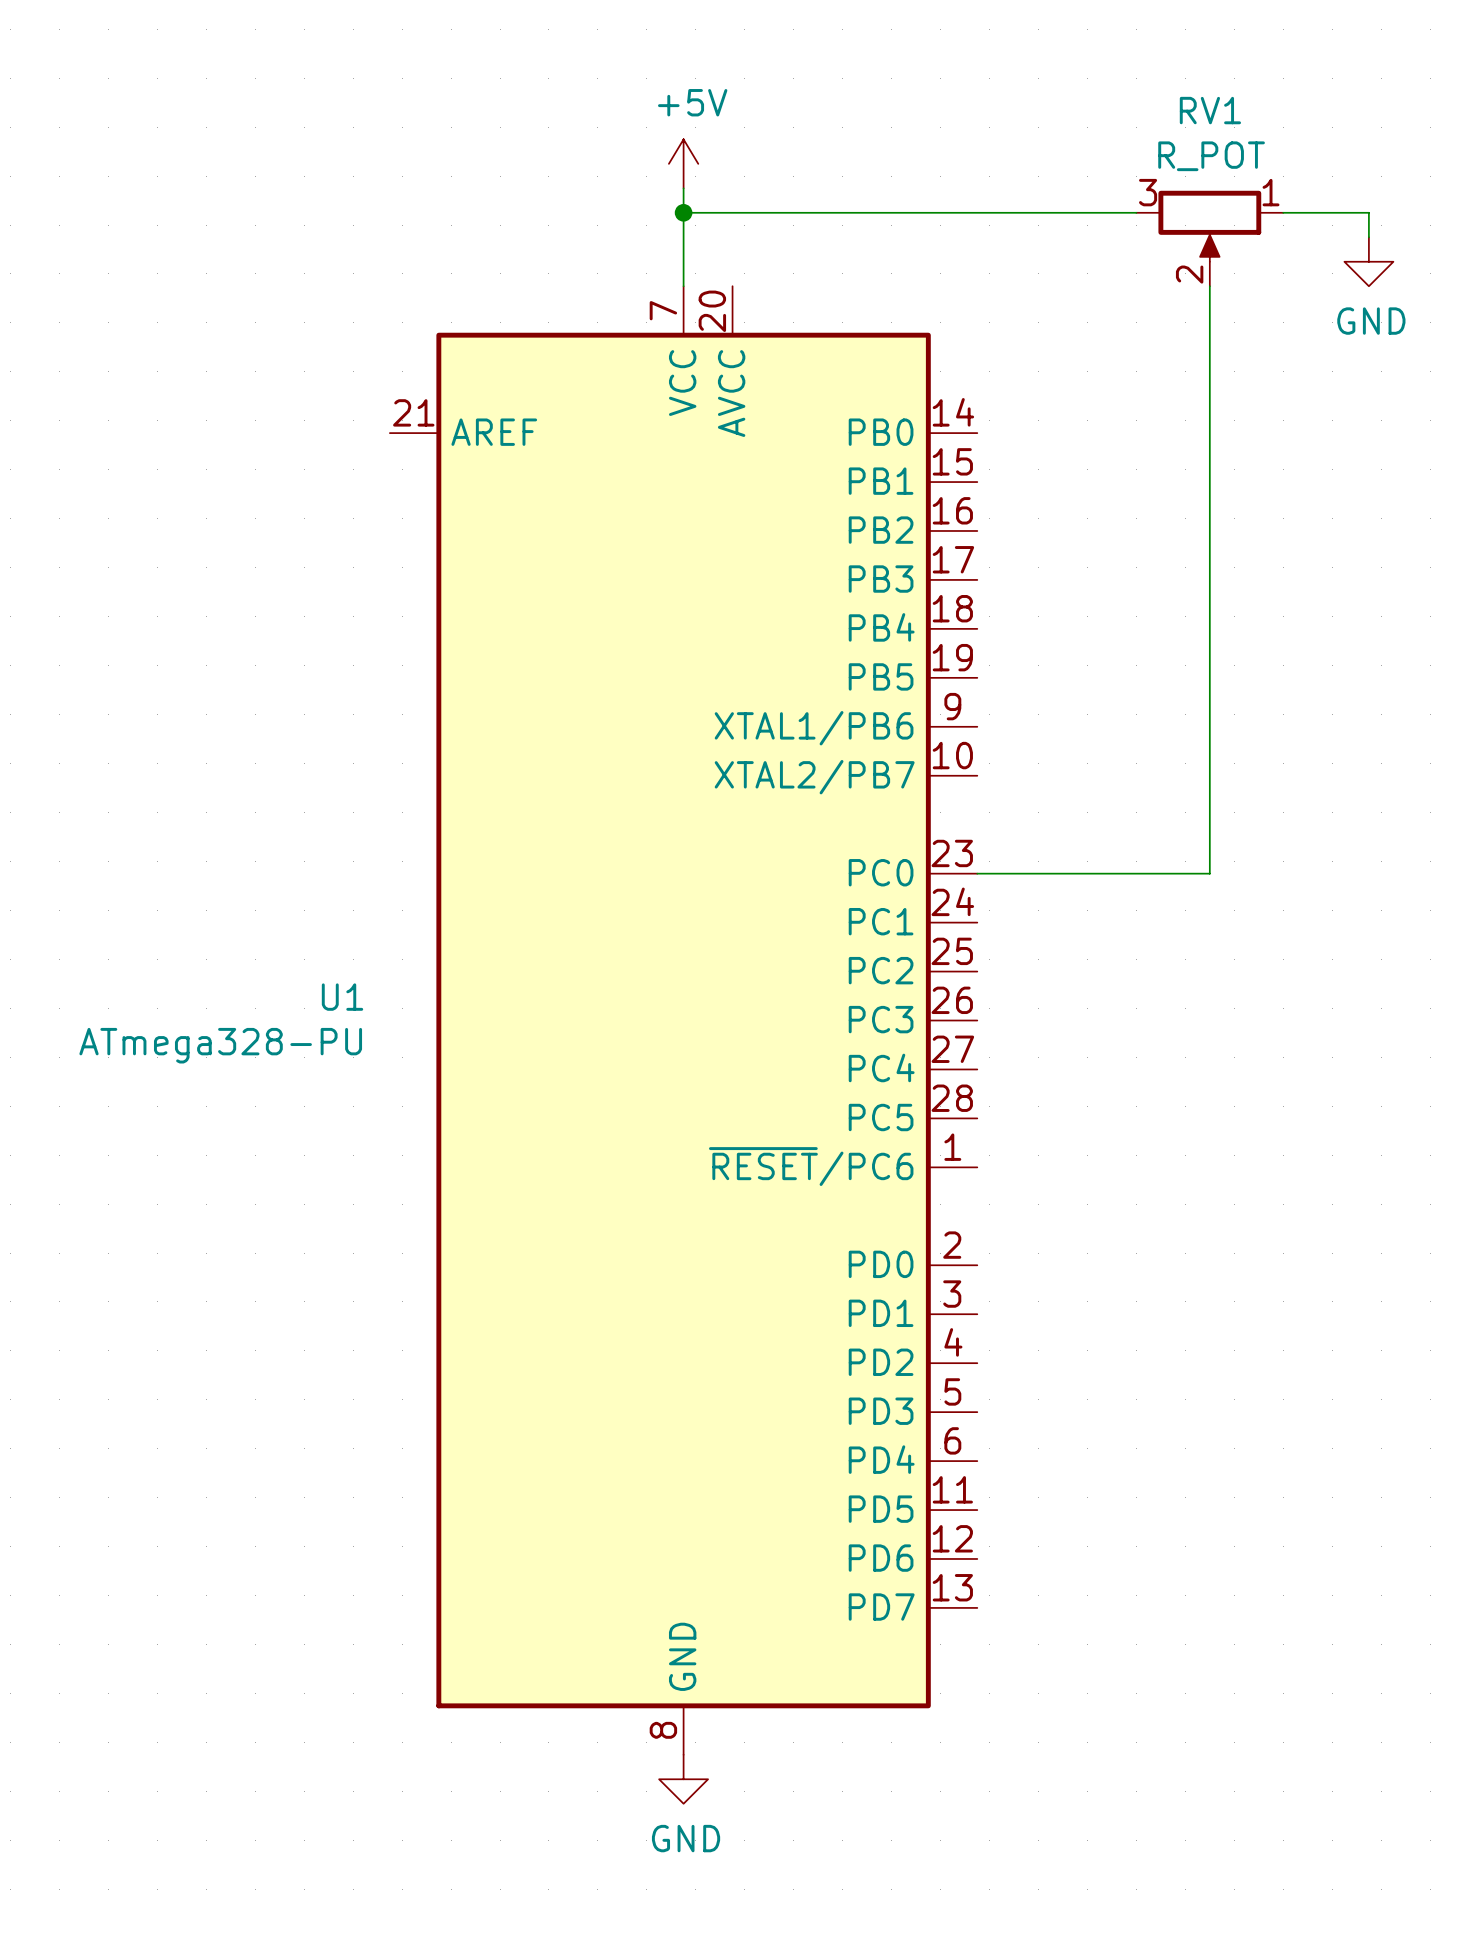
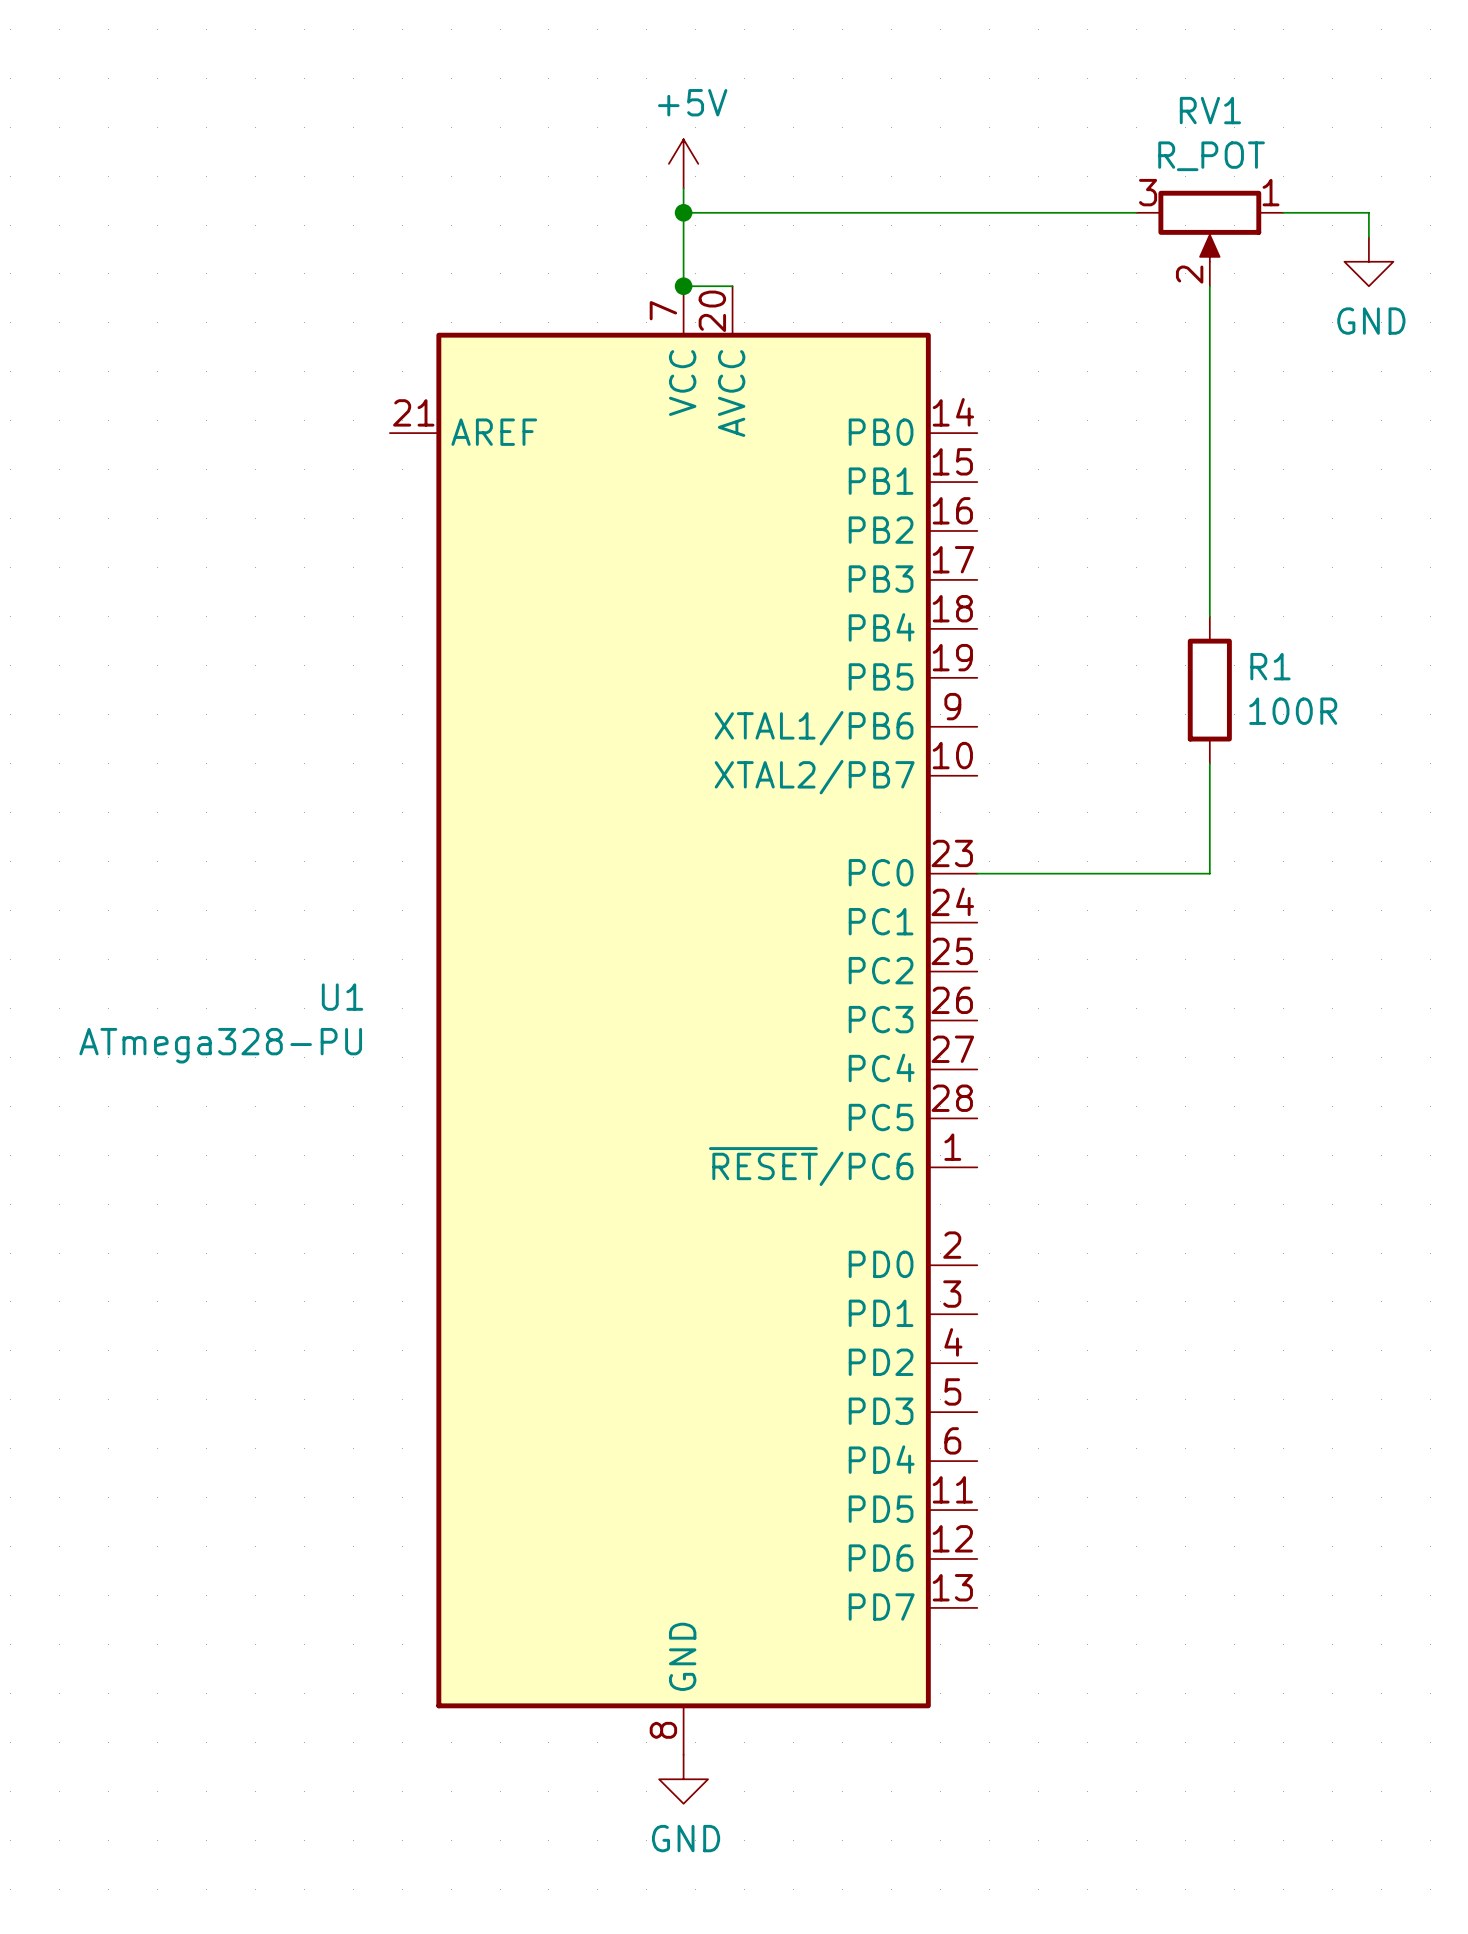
wire: none -> (683, 286) (732, 286)
junction: none -> (683, 286)
wire: (1209, 616) (1209, 763) -> none
R1: none -> 100R (1209, 690)

